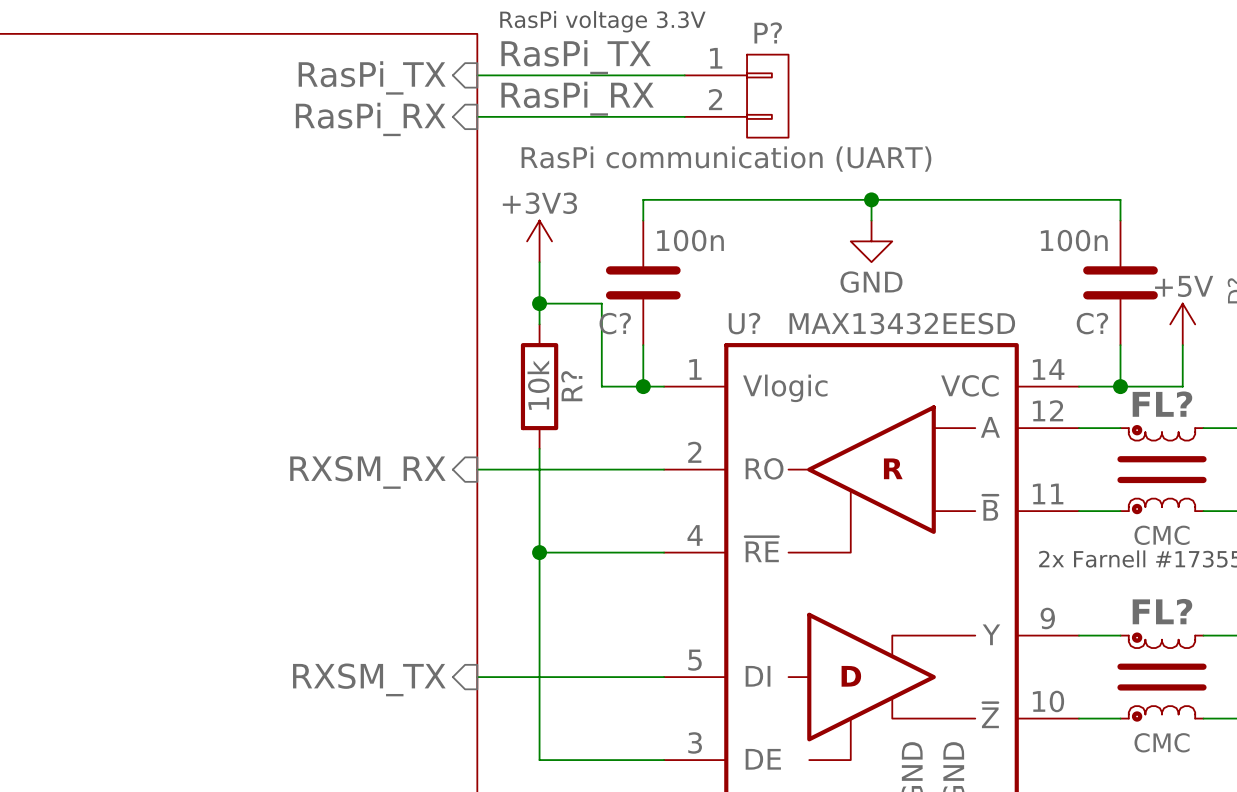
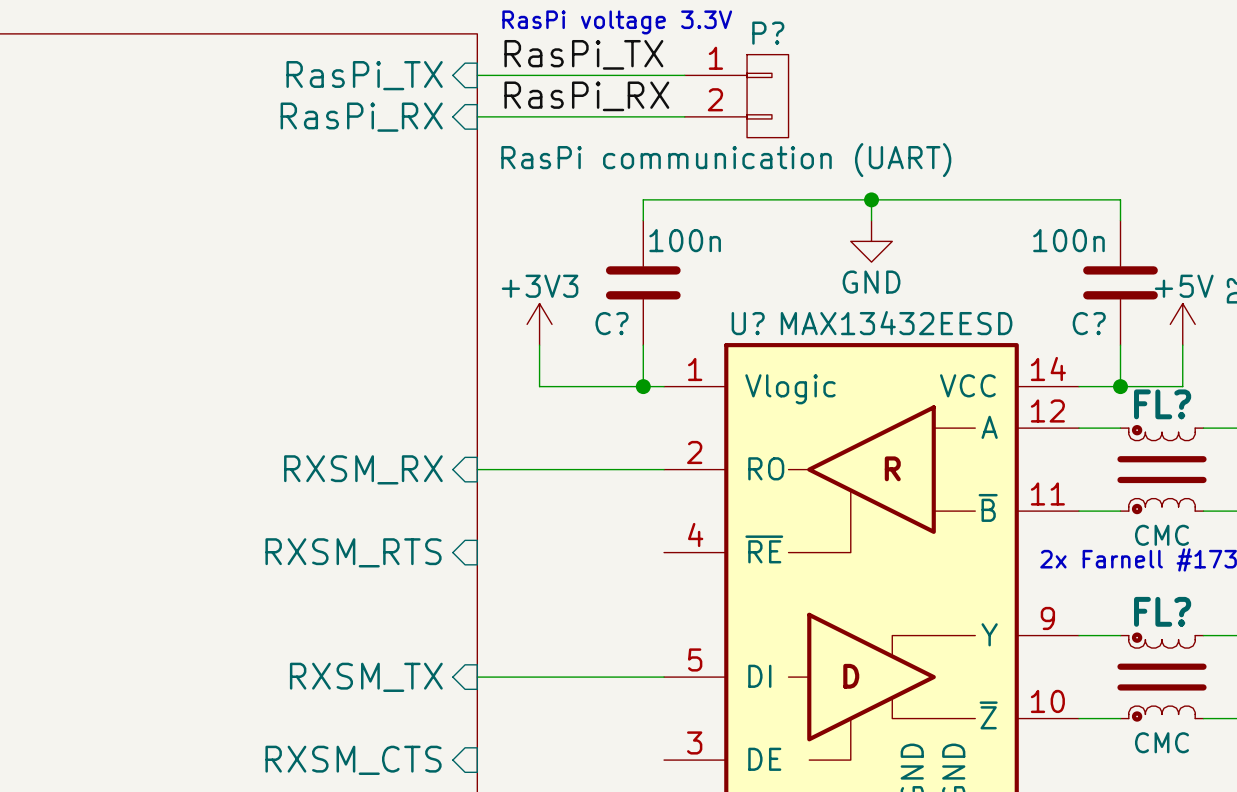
power symbol position: +3V3 (539, 241) -> +3V3 (539, 324)
wire: (539, 262) (539, 324) -> none
wire: (539, 303) (601, 303) (601, 386) -> (539, 345) (539, 386) (601, 386)
junction: (539, 303) -> none
R?: 10k (539, 386) -> none
wire: (539, 448) (539, 760) (664, 760) -> none
wire: (539, 552) (664, 552) -> none
junction: (539, 552) -> none
sheet pin: none -> RXSM_RTS (353, 552)
sheet pin: none -> RXSM_CTS (353, 760)

